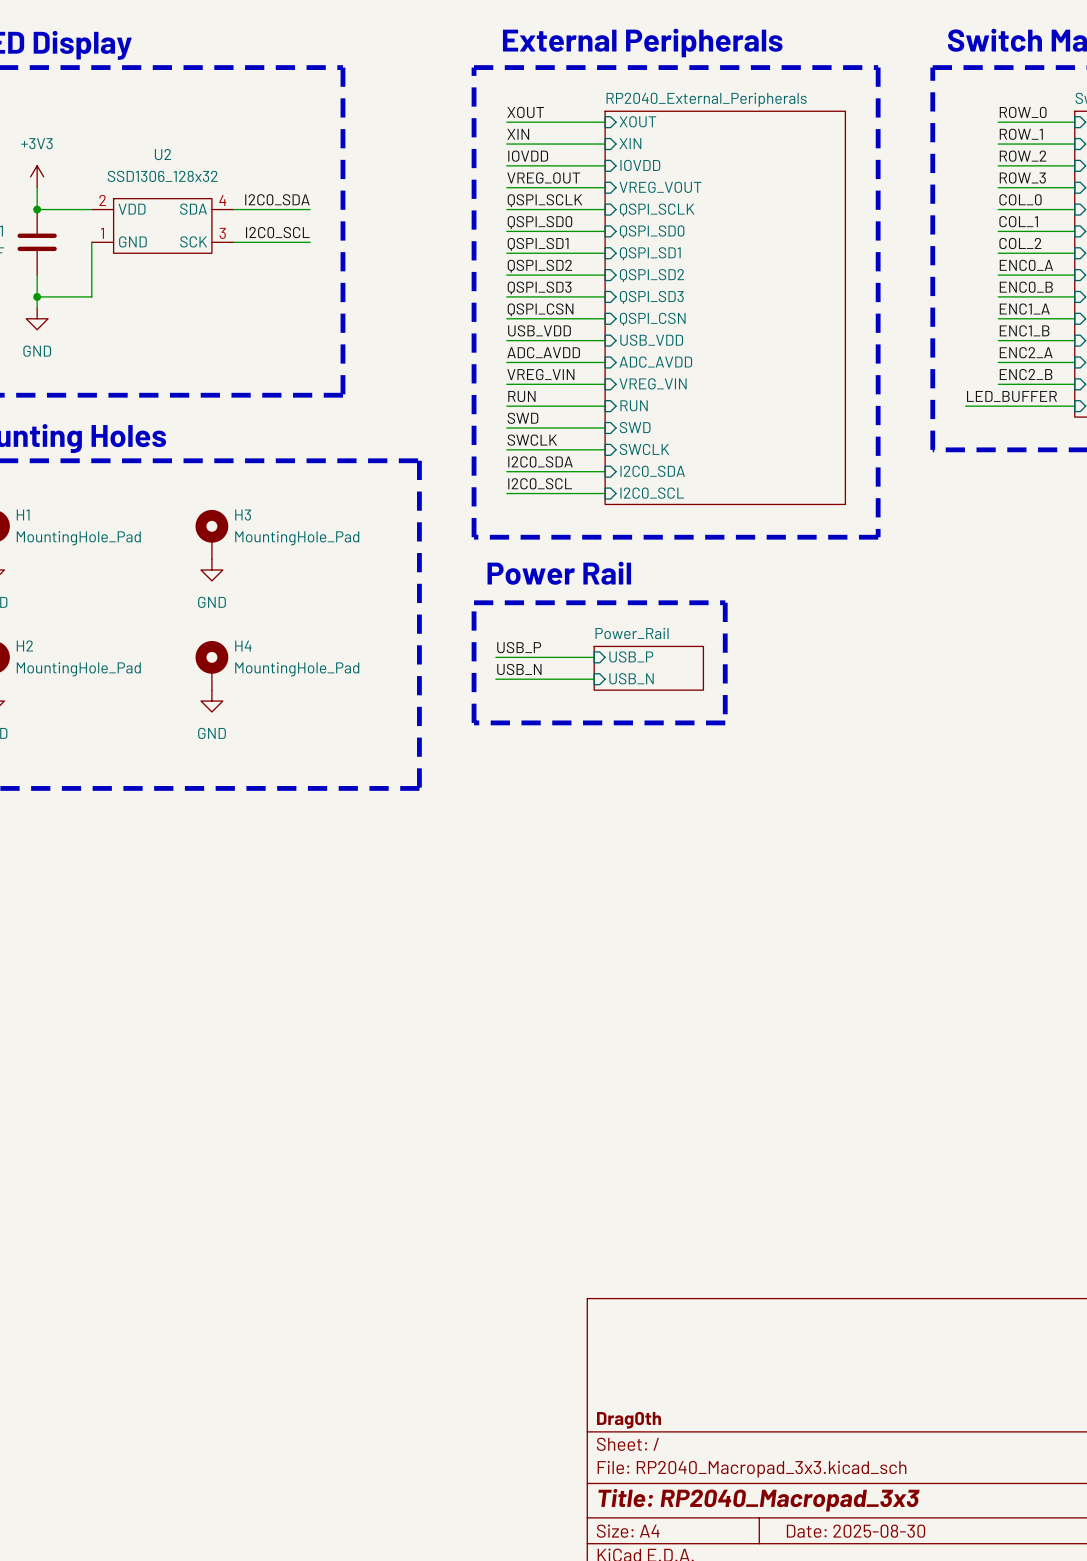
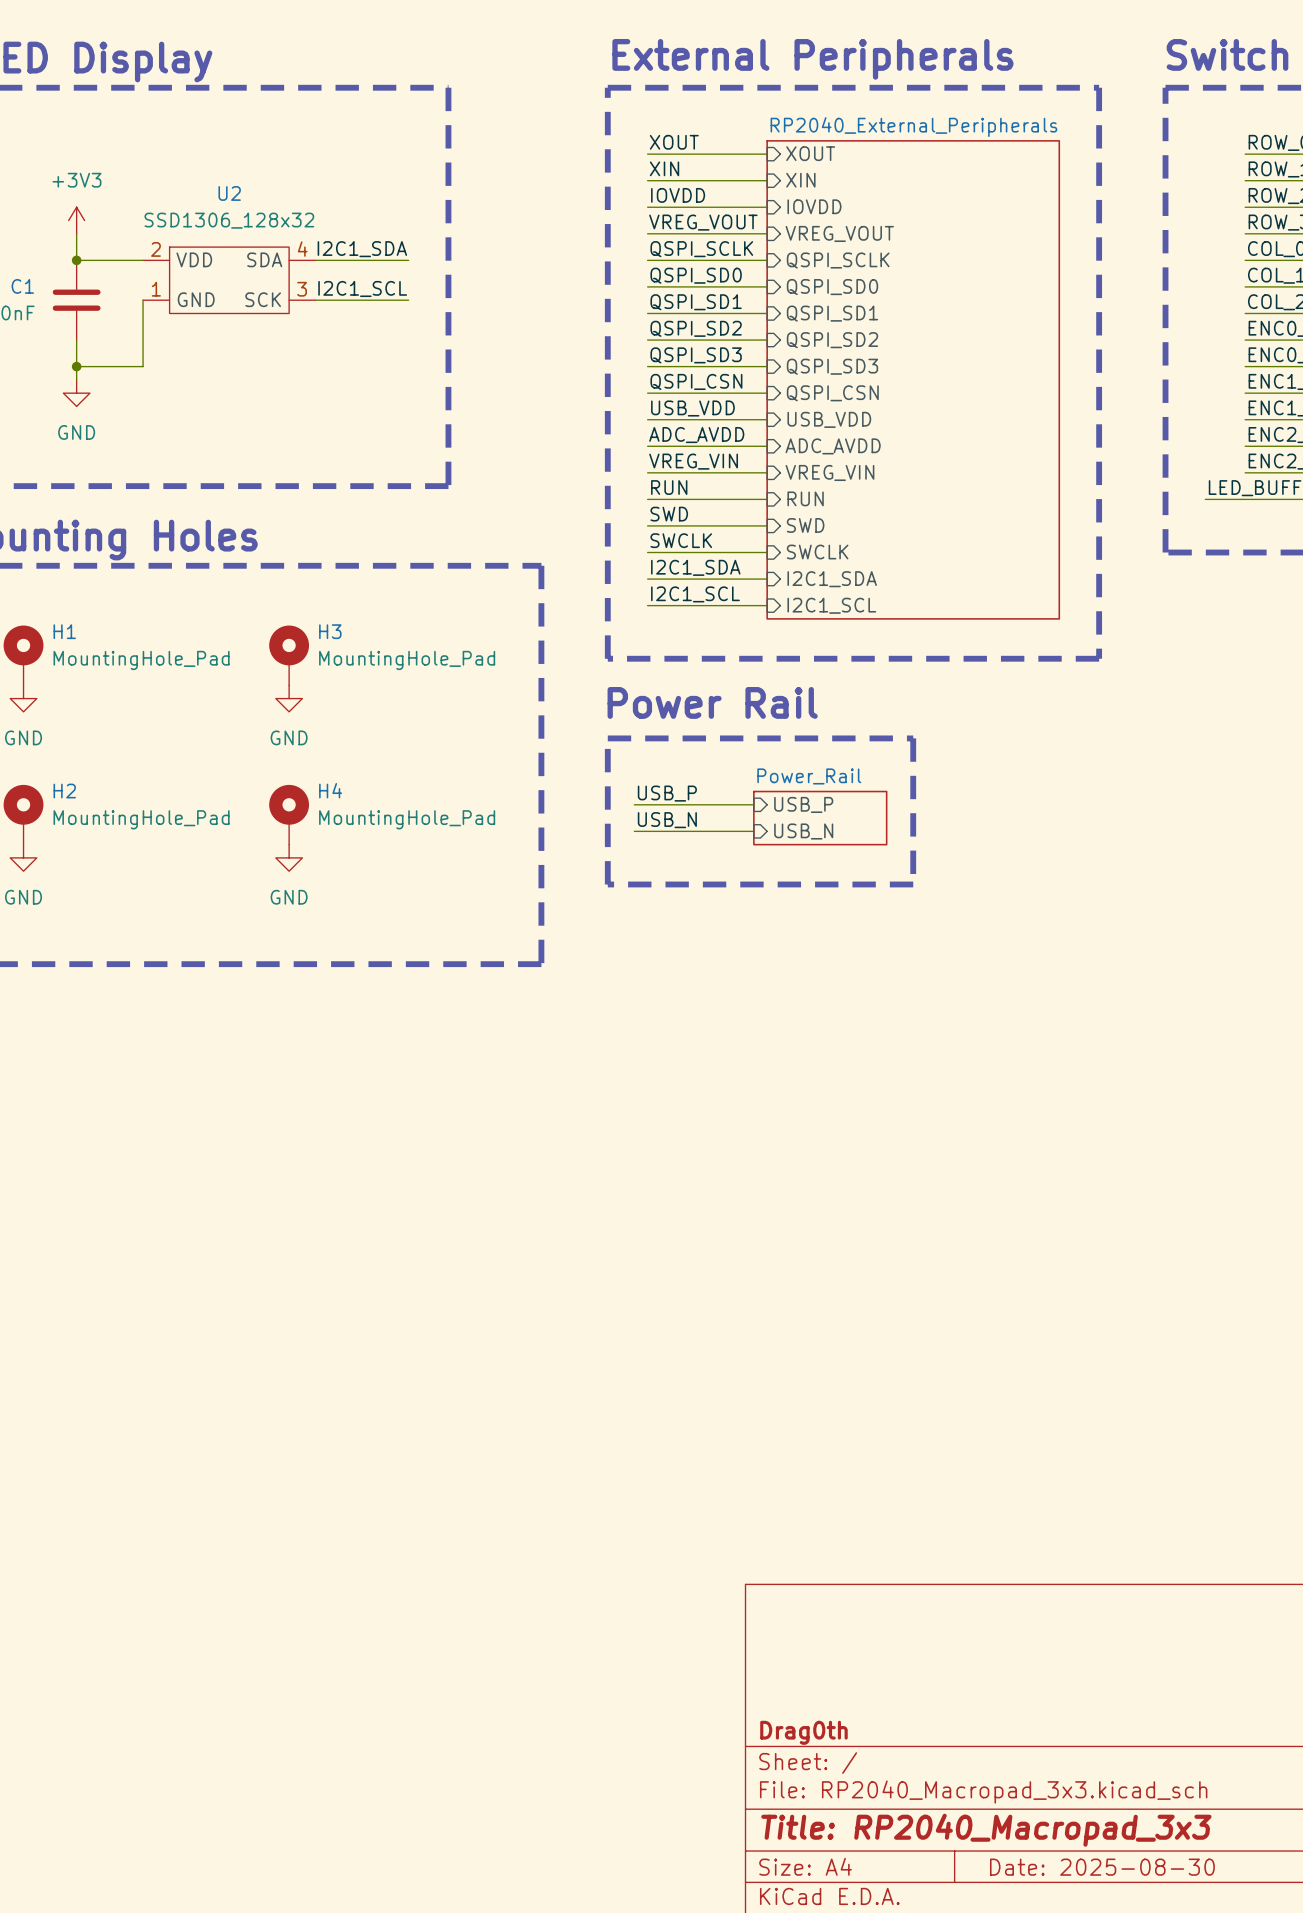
label: VREG_OUT (543, 177) -> VREG_VOUT (703, 222)
label: I2C0_SDA (277, 199) -> I2C1_SDA (362, 249)
label: I2C0_SCL (277, 232) -> I2C1_SCL (362, 288)
label: I2C0_SDA (540, 461) -> I2C1_SDA (695, 567)
sheet pin: I2C0_SDA (652, 471) -> I2C1_SDA (832, 579)
label: I2C0_SCL (540, 483) -> I2C1_SCL (695, 594)
sheet pin: I2C0_SCL (652, 493) -> I2C1_SCL (831, 605)

